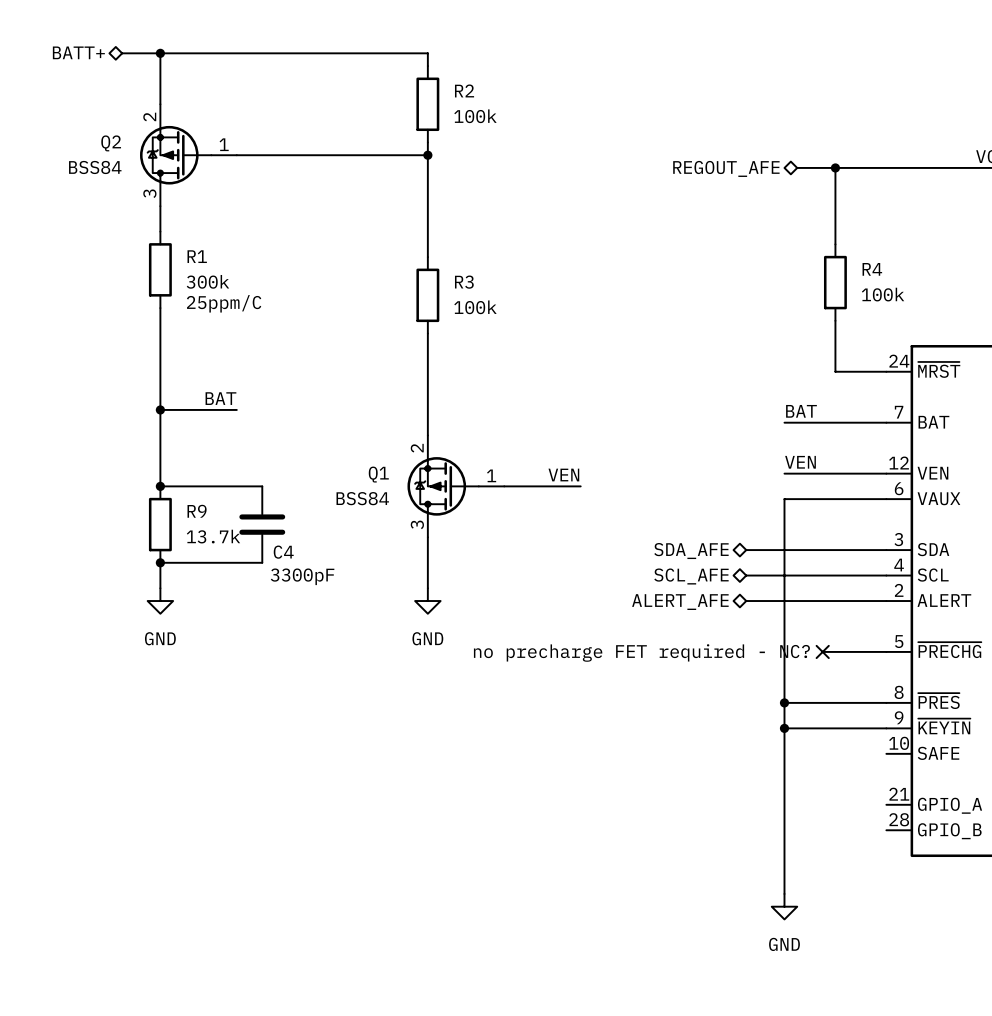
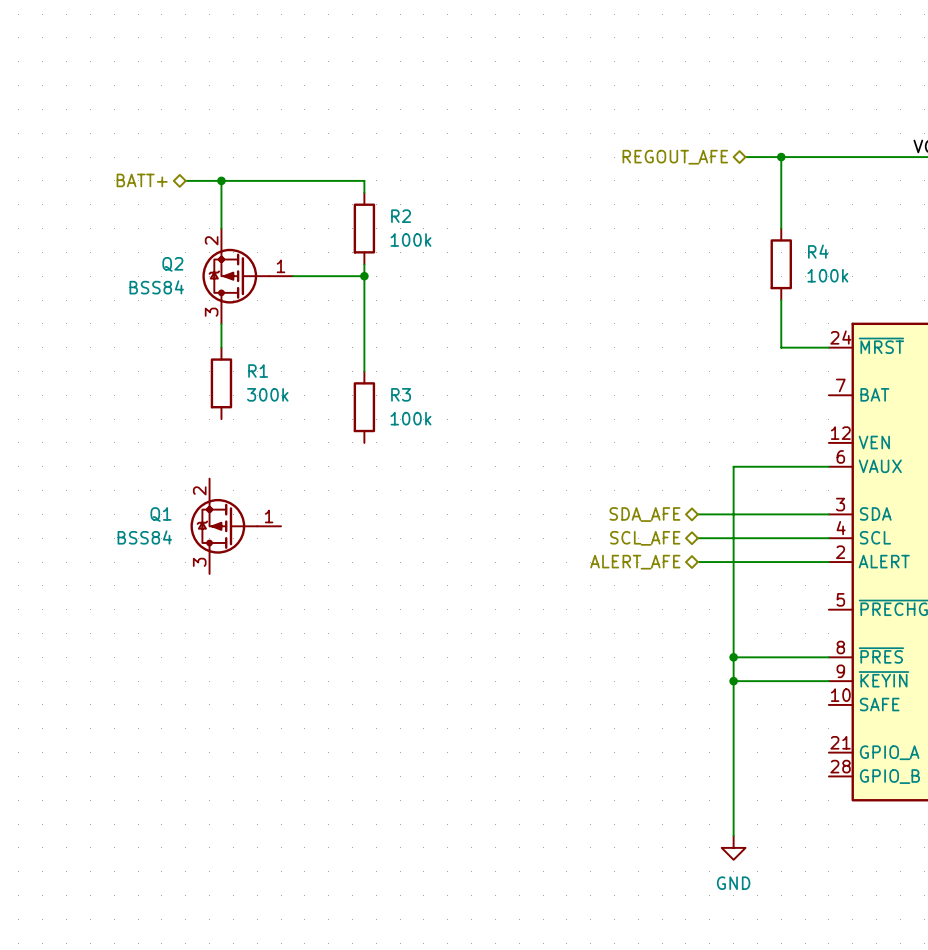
hierarchical label position: BATT+ (78, 52) -> BATT+ (142, 180)
wire: (122, 53) (427, 53) (427, 66) -> none
wire: (160, 53) (160, 104) -> (221, 180) (221, 228)
junction: (160, 53) -> none
R2 position: (427, 104) -> (364, 228)
wire: (427, 142) (427, 257) -> (364, 264) (364, 371)
Q2 position: (188, 155) -> (247, 276)
wire: (236, 155) (427, 155) -> none
junction: (427, 155) -> none
wire: none -> (185, 180) (364, 180) (364, 192)
junction: none -> (221, 180)
wire: (160, 206) (160, 231) -> (221, 323) (221, 347)
R1 position: (160, 269) -> (221, 383)
junction: none -> (364, 276)
R3 position: (427, 295) -> (364, 407)
text: 25ppm/C (224, 303) -> none
wire: (160, 308) (160, 486) (262, 486) -> none
wire: (427, 333) (427, 435) -> none
label: BAT (220, 398) -> none
wire: (160, 409) (236, 409) -> (292, 276) (364, 276)
junction: (160, 409) -> none
label: BAT (801, 411) -> none
wire: (784, 422) (886, 422) -> none
label: VEN (800, 462) -> none
wire: (784, 473) (886, 473) -> none
label: VEN (563, 475) -> none
junction: (160, 486) -> none
Q1 position: (455, 486) -> (235, 526)
wire: (504, 486) (580, 486) -> none
R9: 13.7k (160, 524) -> none
C4: 3300pF (262, 524) -> none
wire: (427, 537) (427, 588) -> none
junction: (160, 562) -> none
wire: (262, 562) (160, 562) (160, 588) -> none
power symbol: GND (160, 601) -> none
power symbol: GND (427, 601) -> none
wire: (822, 651) (886, 651) -> none
no-connect mark: (822, 651) -> none
text: no precharge FET required - NC? (641, 653) -> none

